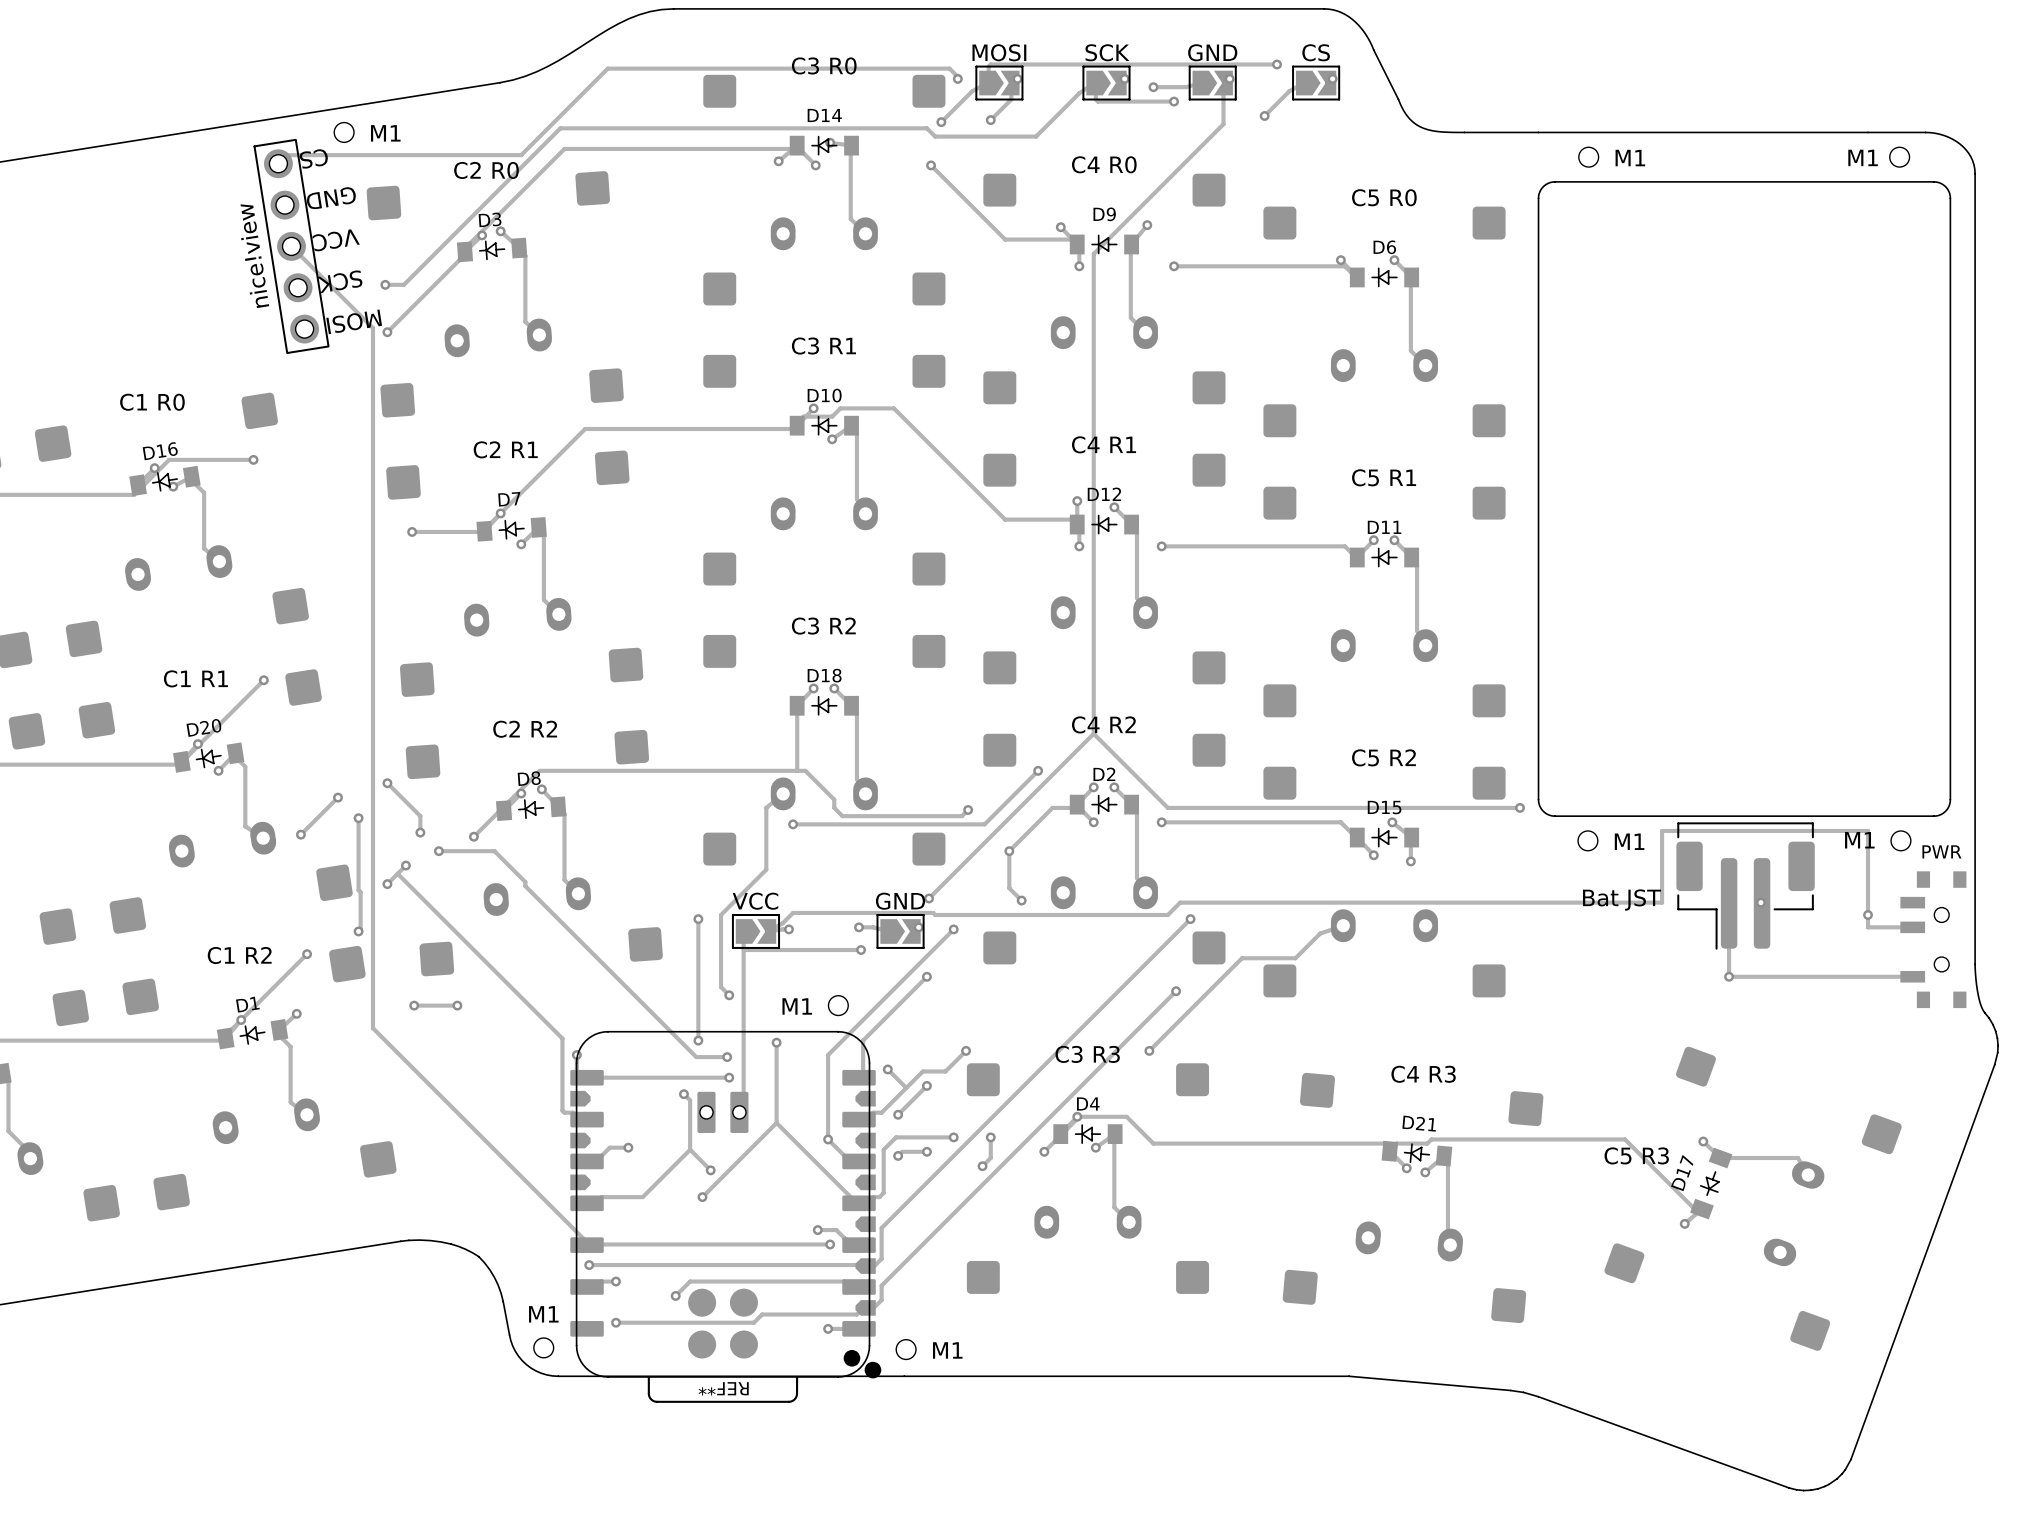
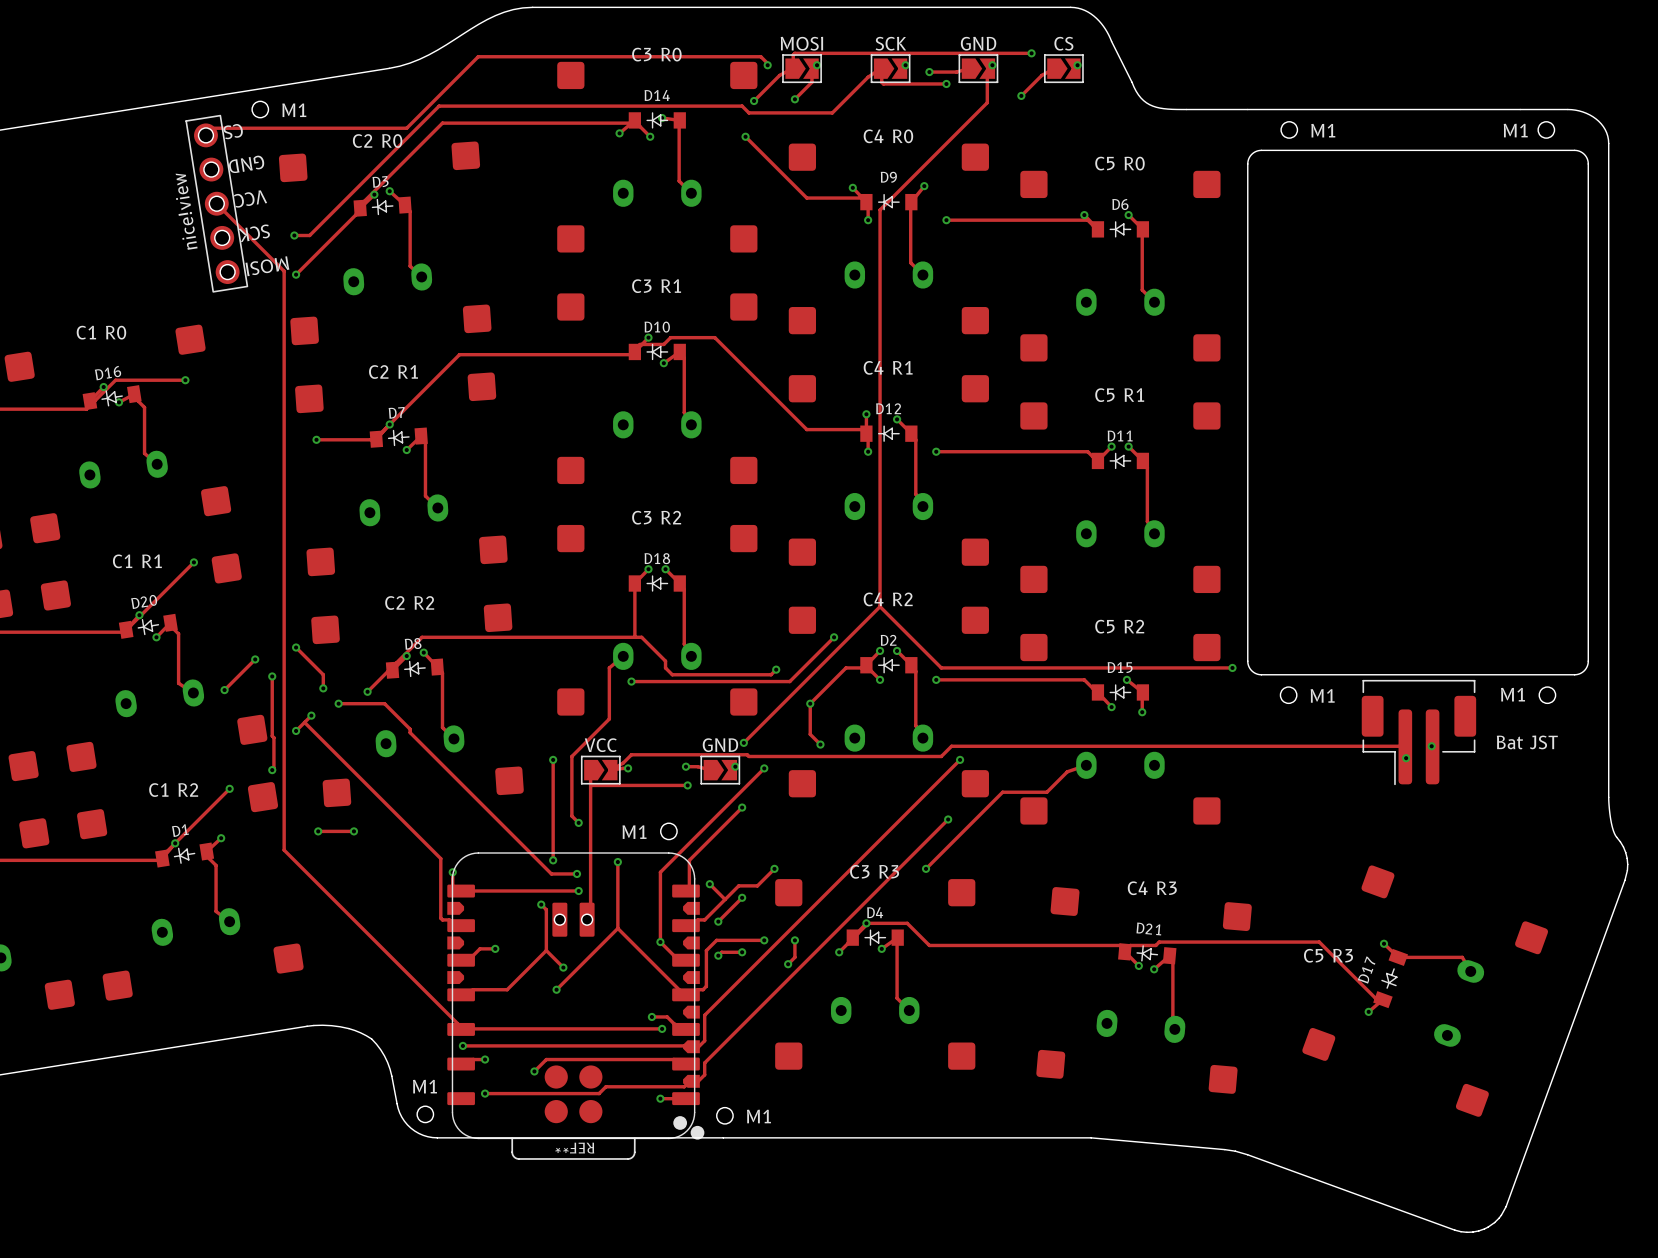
Bat JST name position: Bat JST (1622, 900) -> Bat JST (1527, 742)
track: (1662, 902) (1662, 830) (1868, 830) (1868, 927) (1912, 927) -> (1349, 746) (1405, 746)
track: (1729, 903) (1729, 976) (1912, 976) -> none
via: (1868, 914) -> none
PWR: (1933, 939) -> none
via position: (1729, 976) -> (1406, 758)

